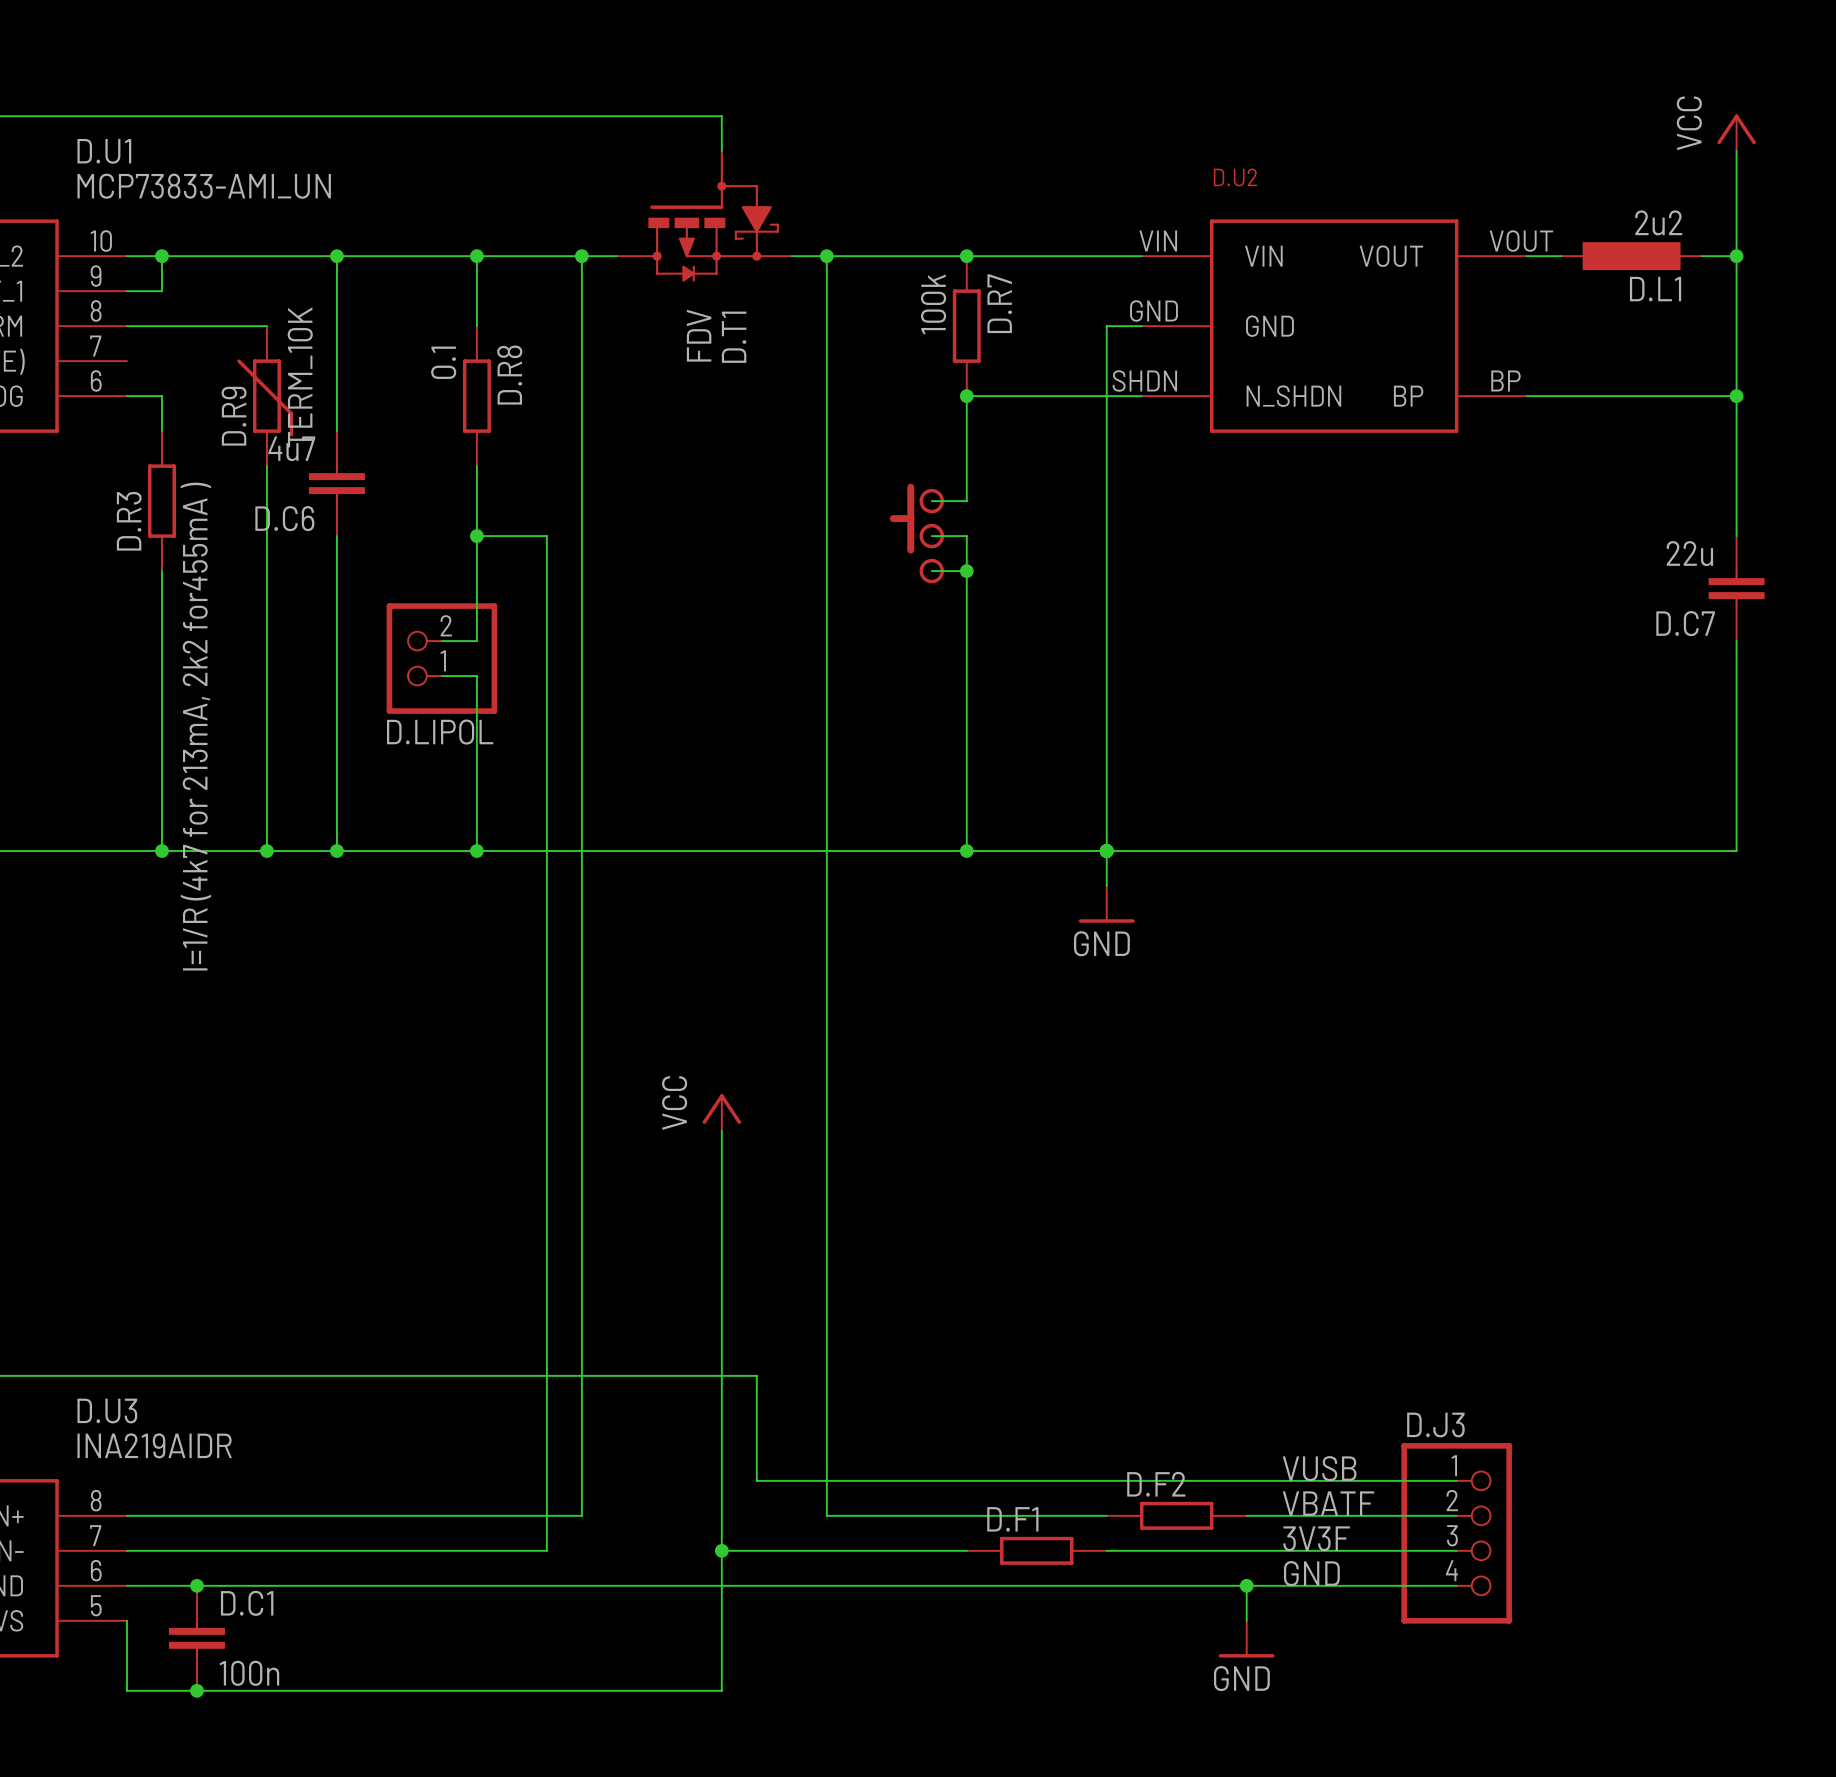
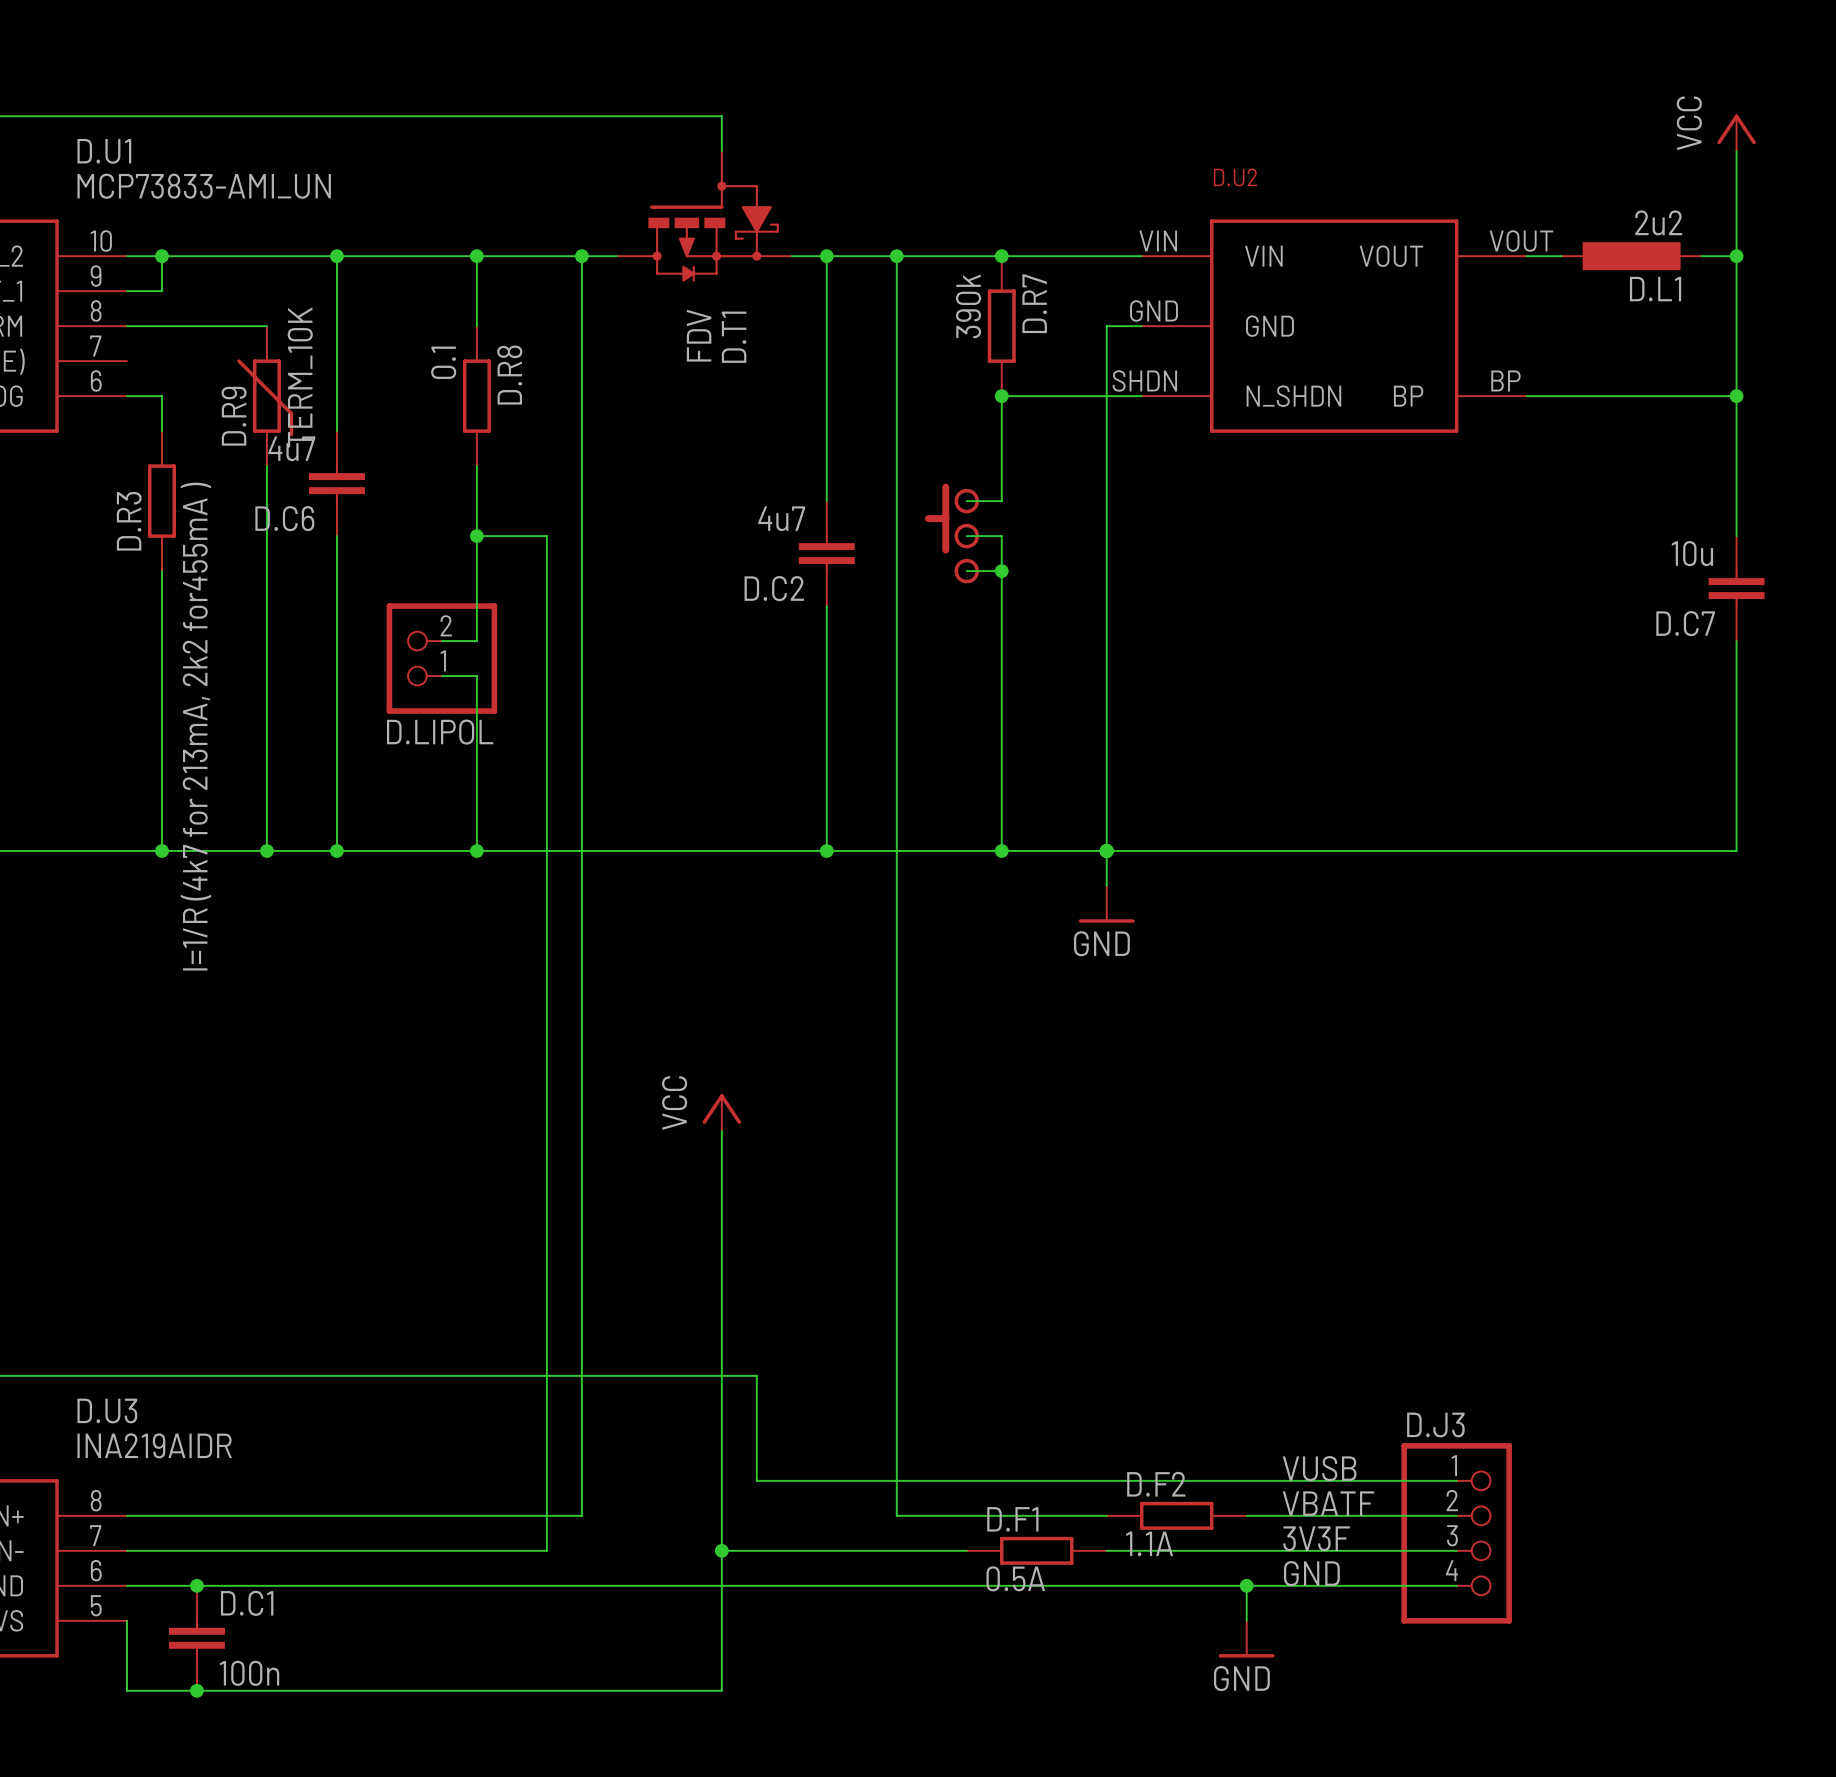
junction: none -> (896, 256)
junction: (966, 256) -> none
junction: none -> (1001, 256)
D.R7 value: 100k (933, 304) -> 390k (968, 306)
D.R7 position: (966, 326) -> (1001, 326)
junction position: (966, 396) -> (1001, 396)
wire: (1001, 396) (966, 396) (966, 501) (931, 501) -> (1001, 396) (1001, 501) (966, 501)
part position: (916, 533) -> (951, 533)
wire: (931, 536) (966, 536) (966, 851) -> (966, 536) (1001, 536) (1001, 851)
D.C2: none -> 4u7 (826, 553)
D.C7 value: 22u (1689, 553) -> 10u (1692, 553)
wire: (931, 571) (966, 571) -> (1001, 571) (966, 571)
junction position: (966, 571) -> (1001, 571)
wire: (826, 851) (826, 1515) (896, 1515) -> (896, 256) (896, 1515)
junction: none -> (826, 851)
junction position: (966, 851) -> (1001, 851)
D.F2 value: none -> 1.1A (1149, 1543)
D.F1 value: none -> 0.5A (1015, 1578)

